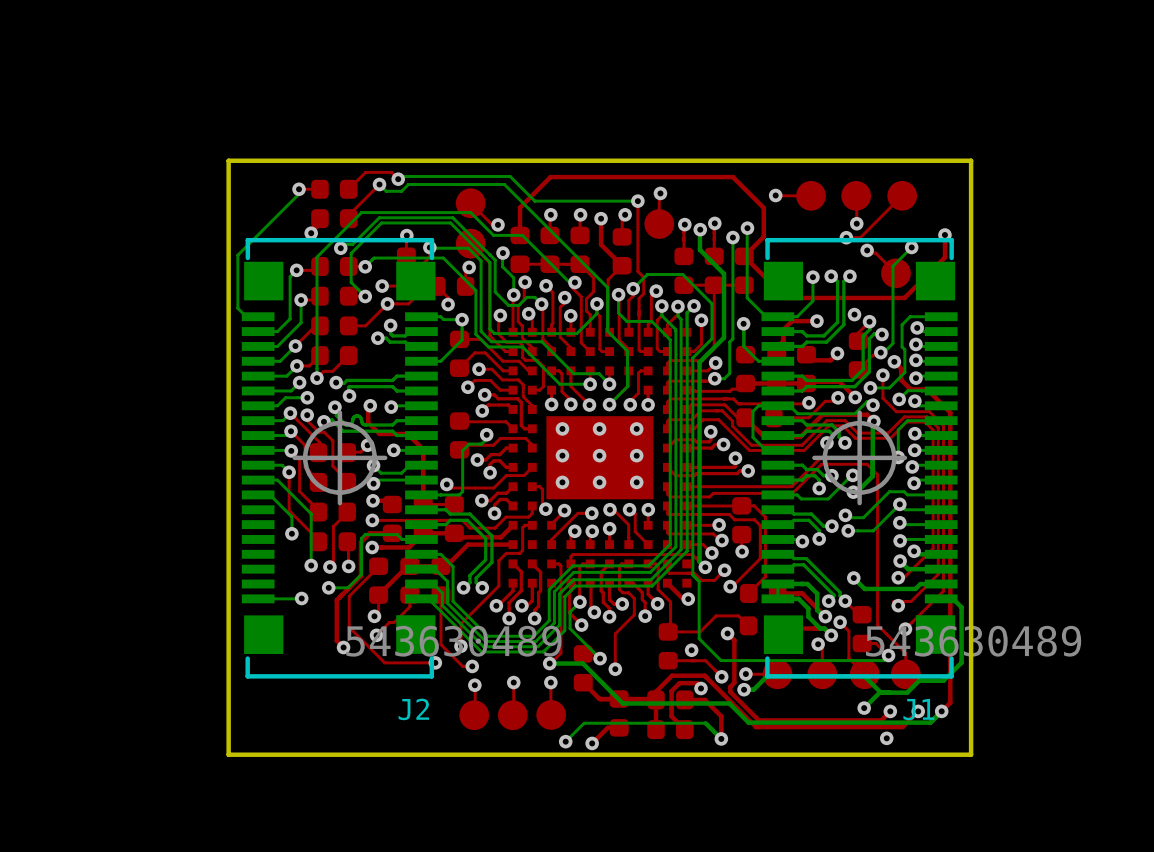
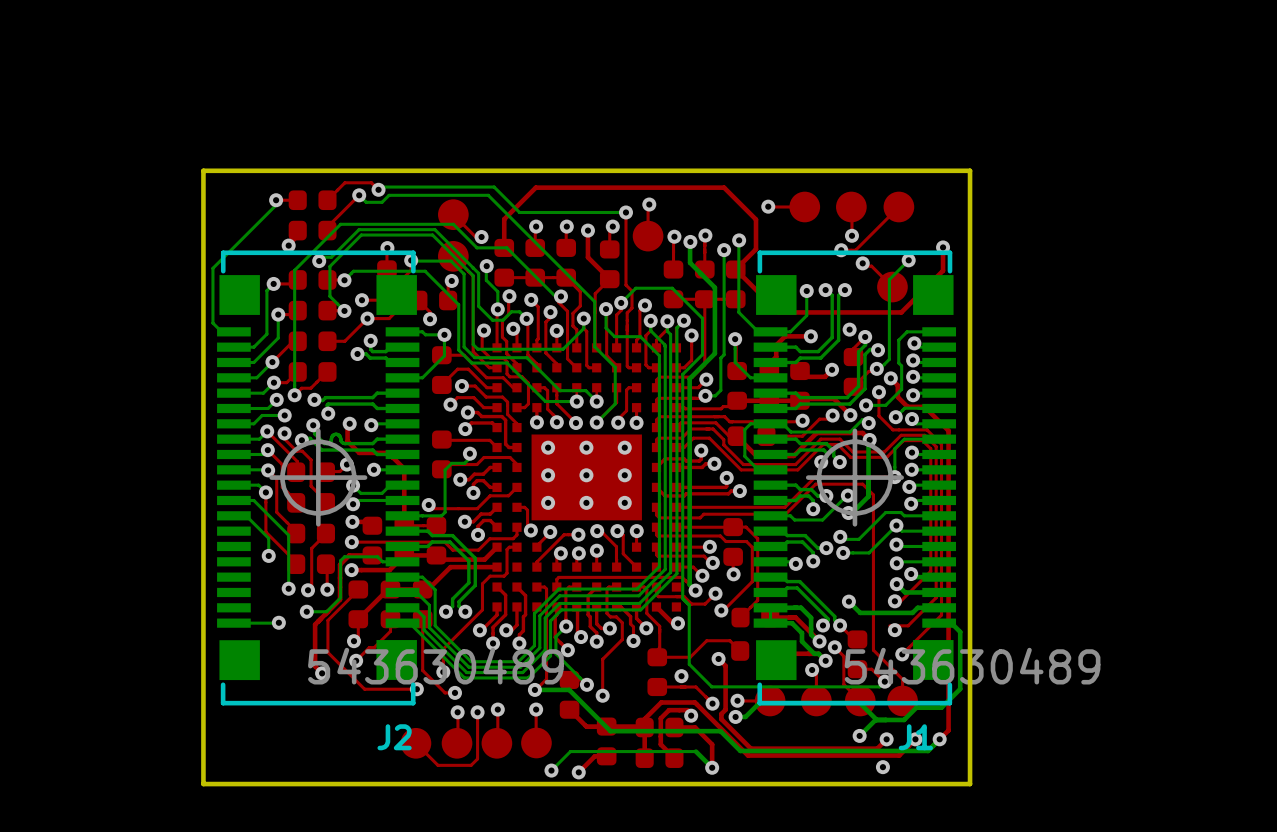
top track: none -> (477, 712) (477, 758) (471, 765) (437, 765) (415, 743)
via: none -> (477, 712)
part: none -> (415, 743)

